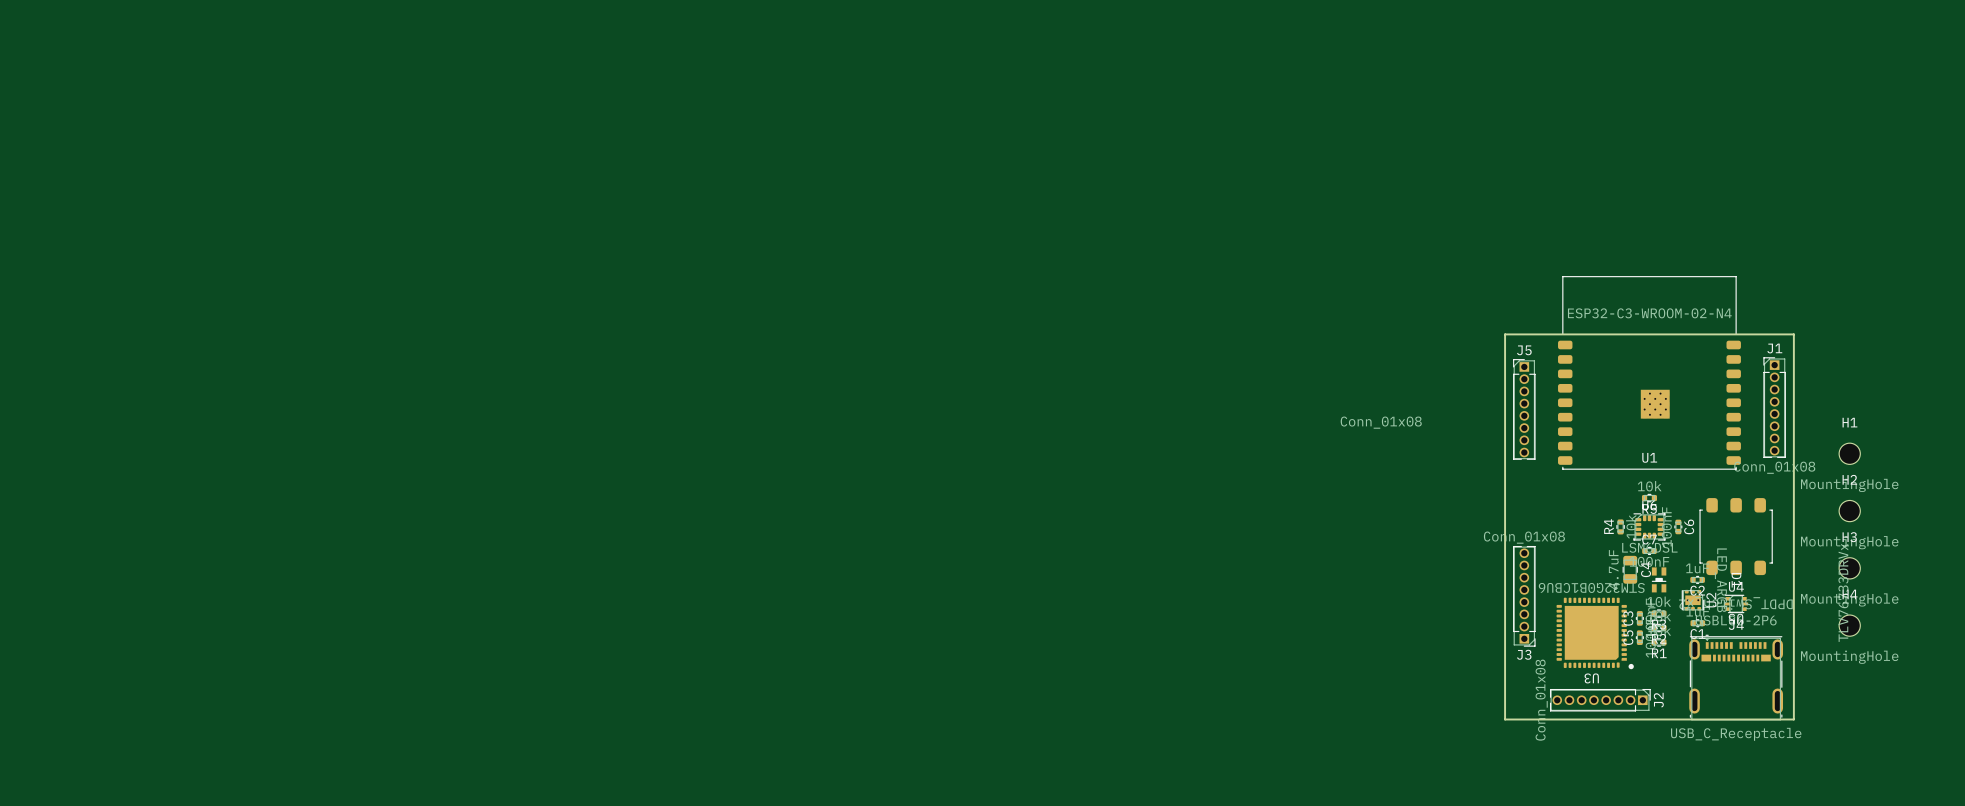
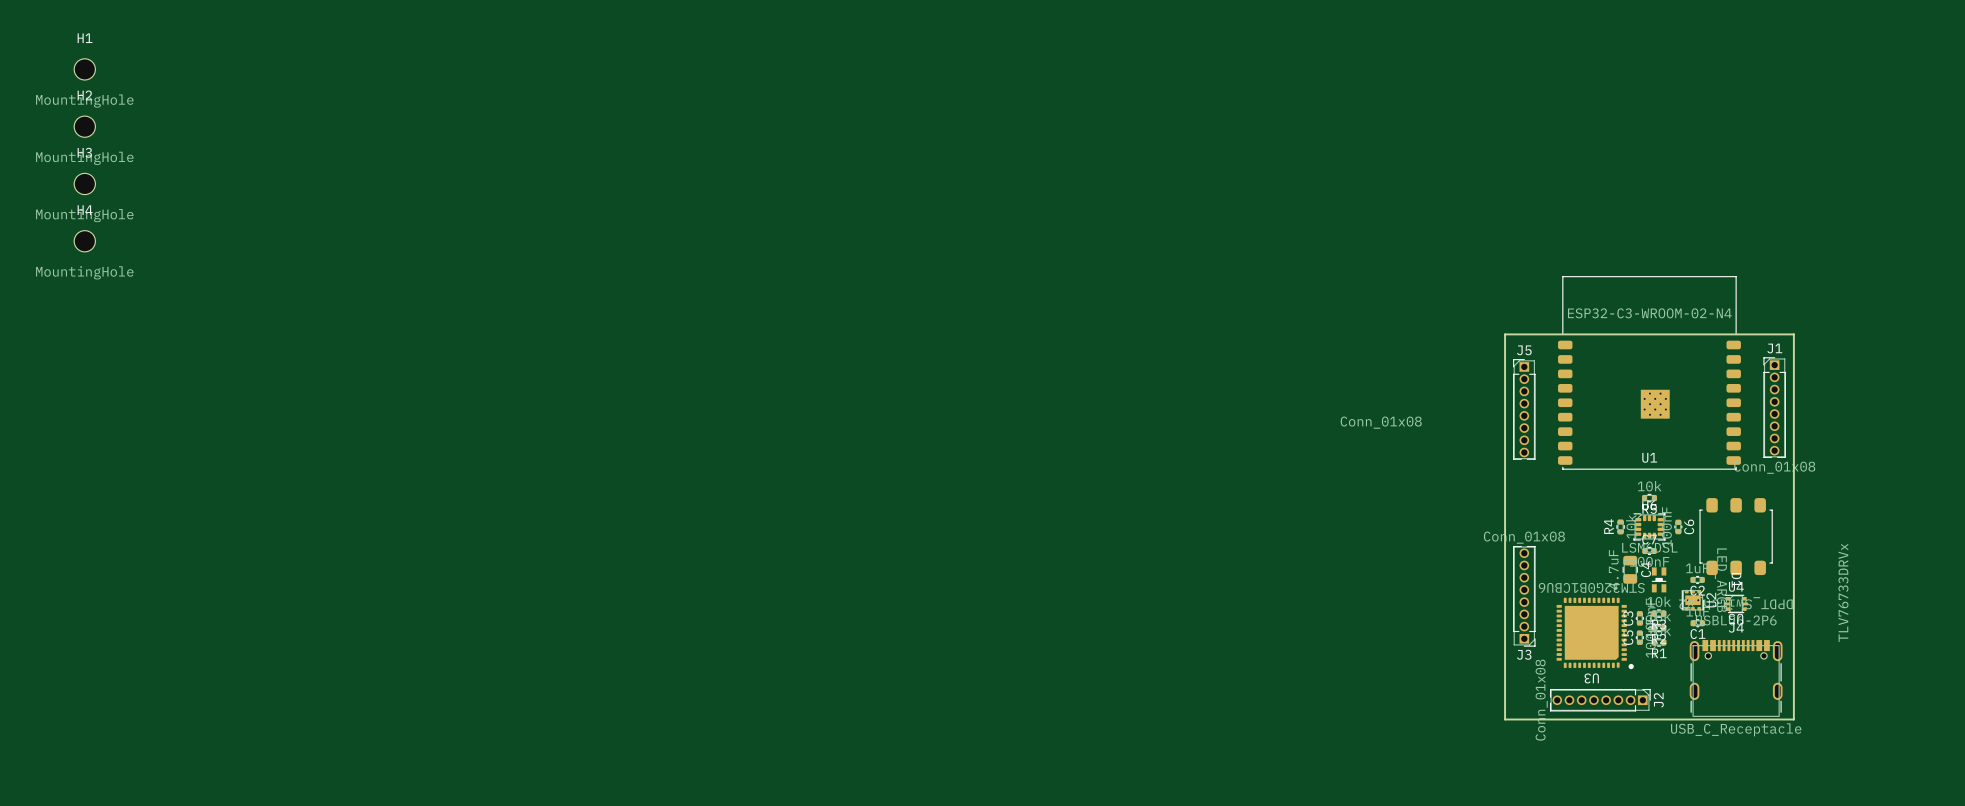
H1 position: (1849, 453) -> (84, 69)
H2 position: (1849, 511) -> (84, 126)
H3 position: (1849, 568) -> (84, 183)
H4 position: (1849, 625) -> (84, 241)
J4 footprint: [1689, 634, 1784, 721] -> [1689, 640, 1783, 717]

